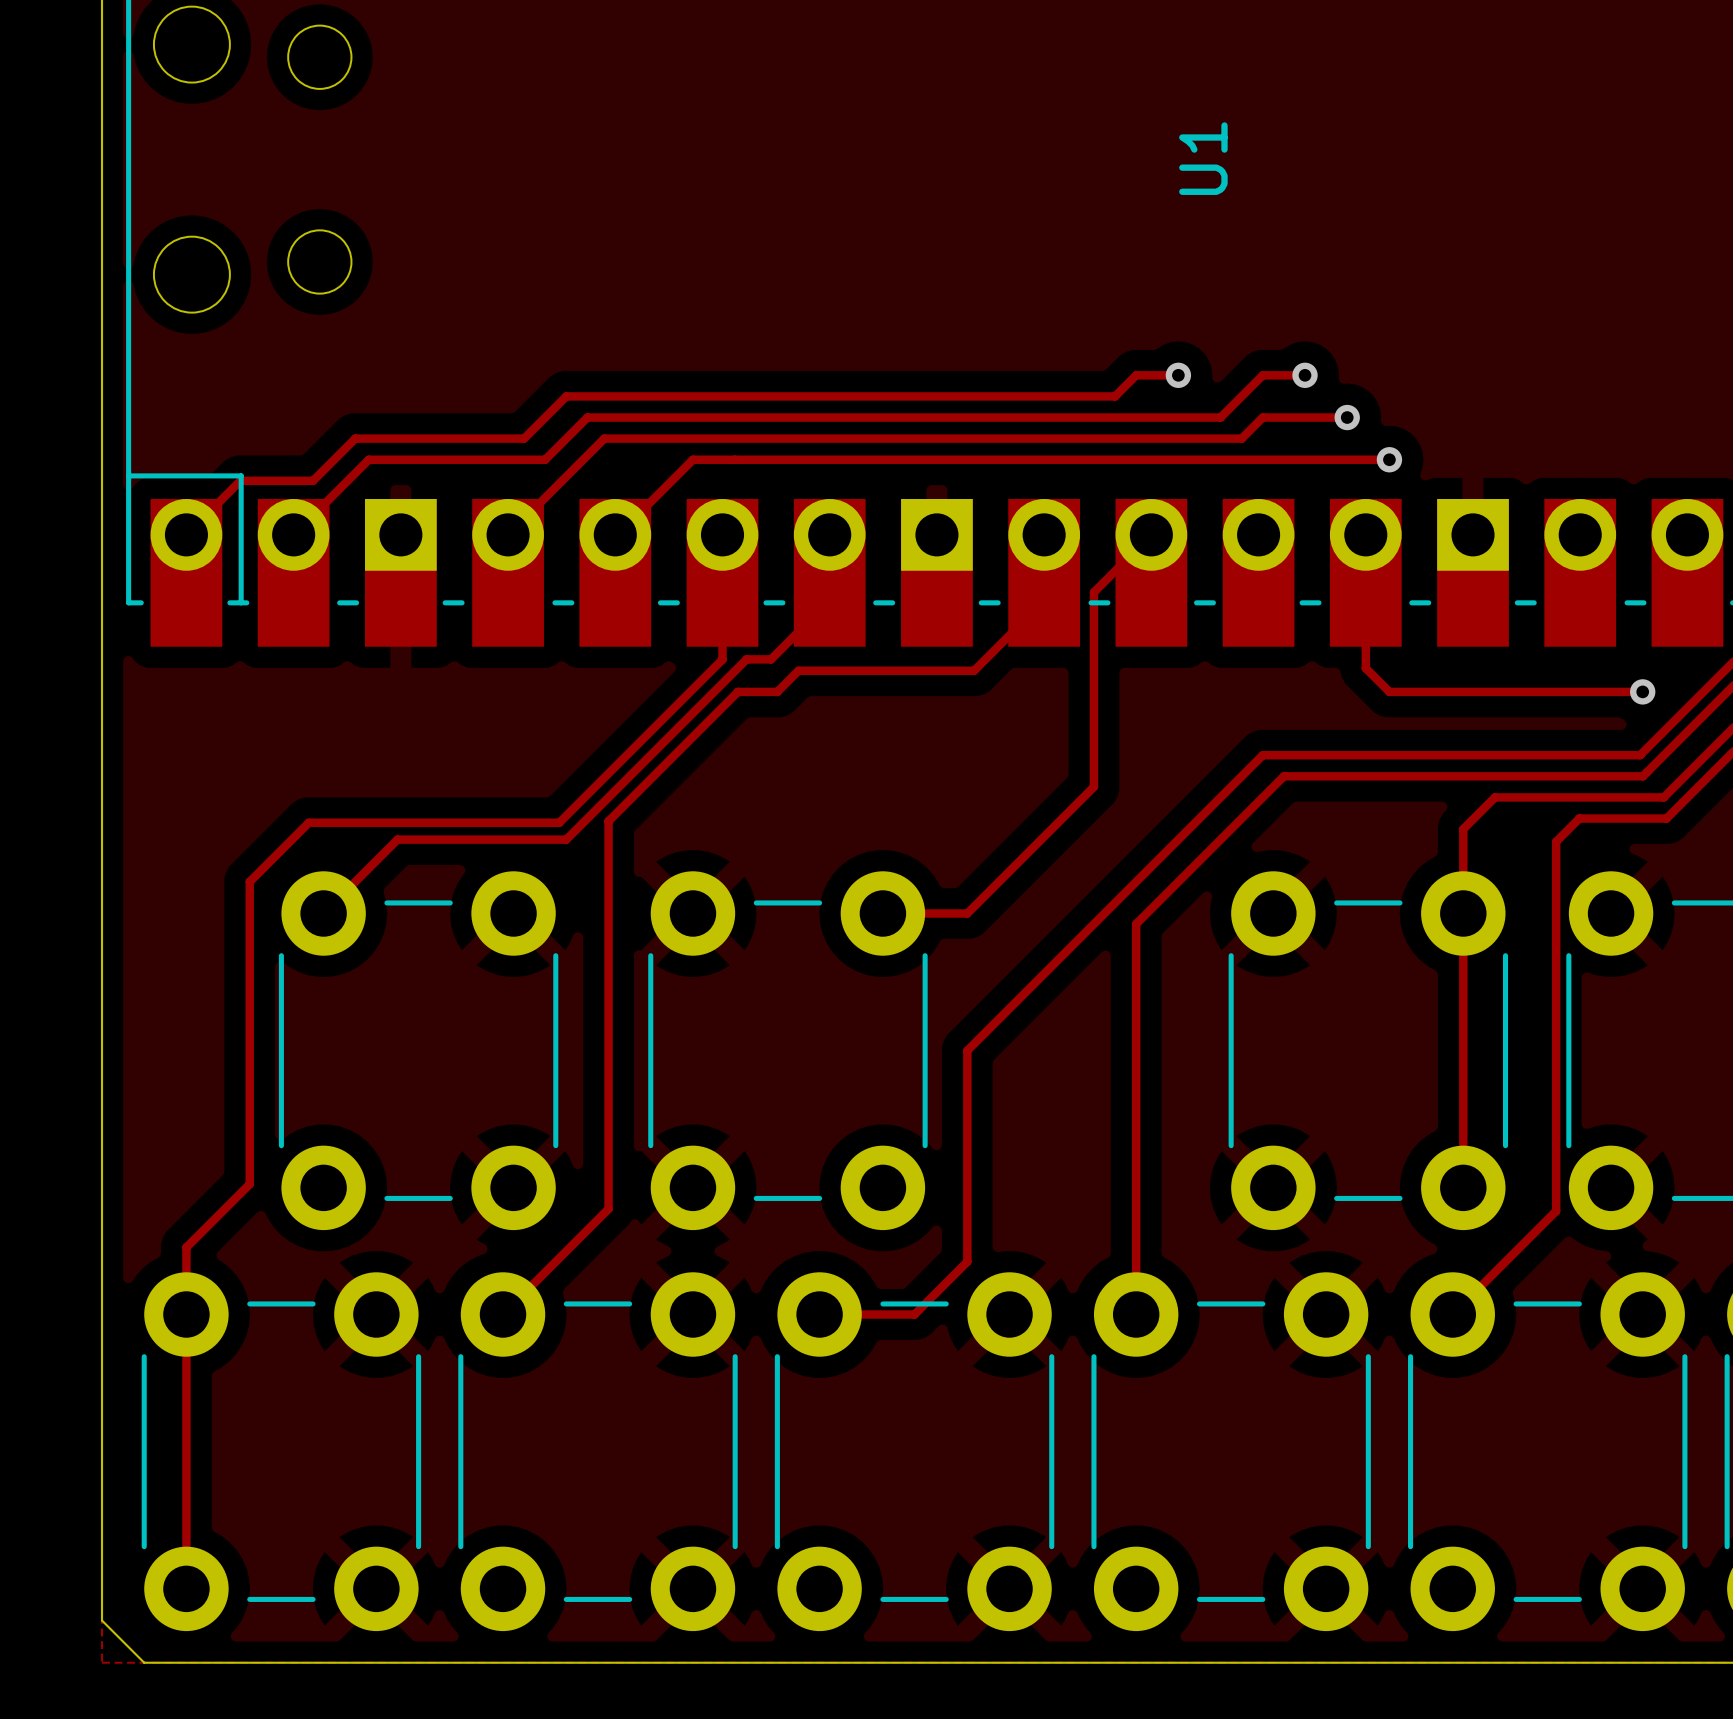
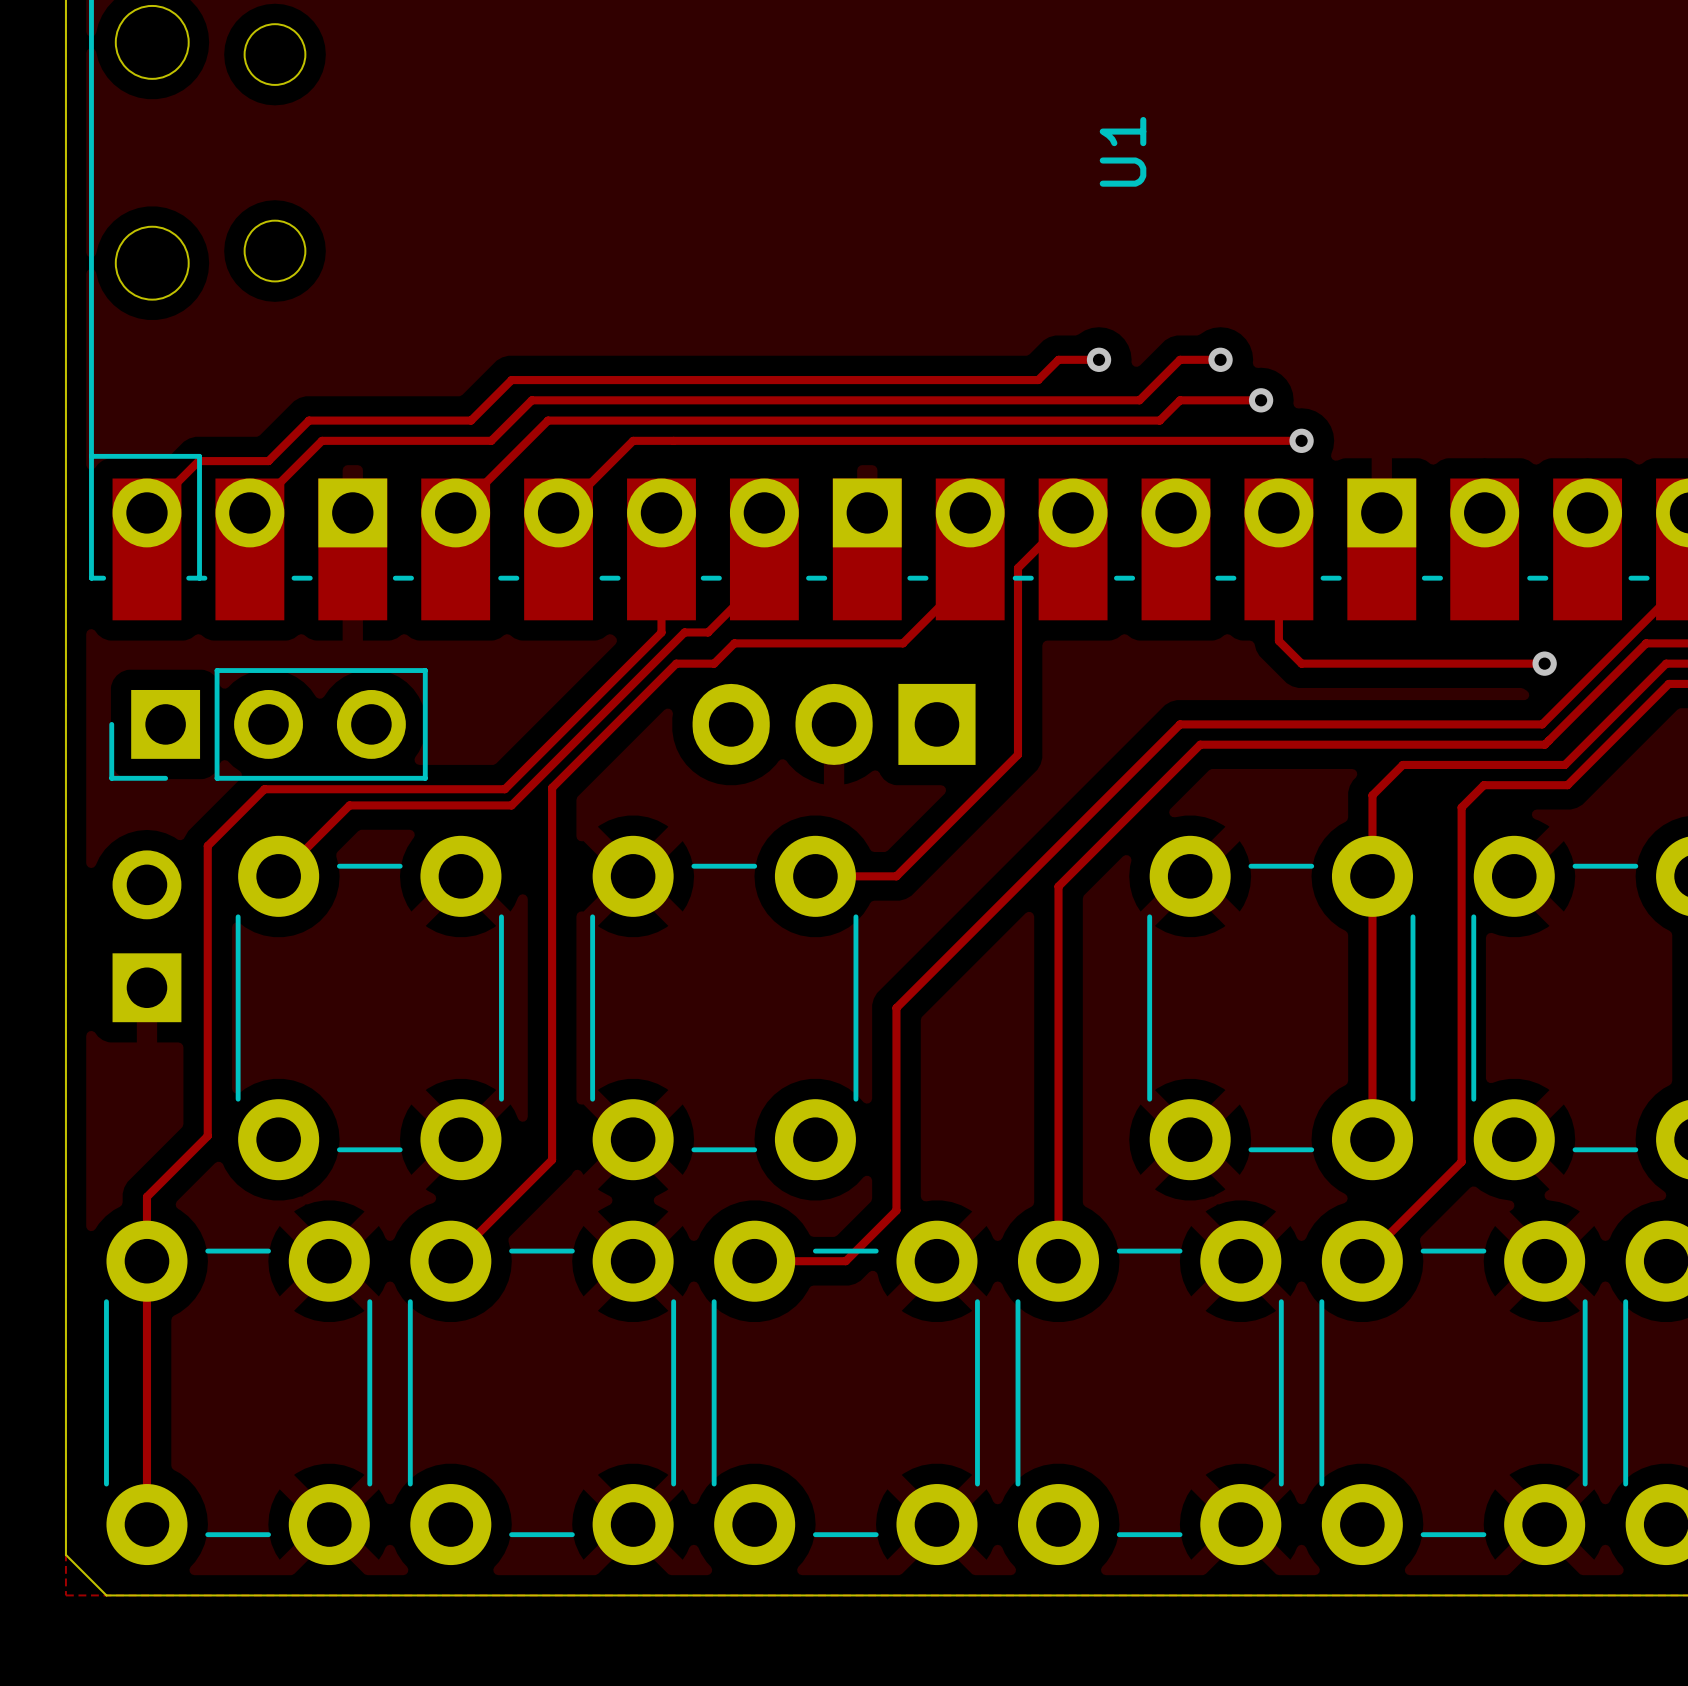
part: none -> (268, 724)
part: none -> (834, 724)
part: none -> (146, 936)

